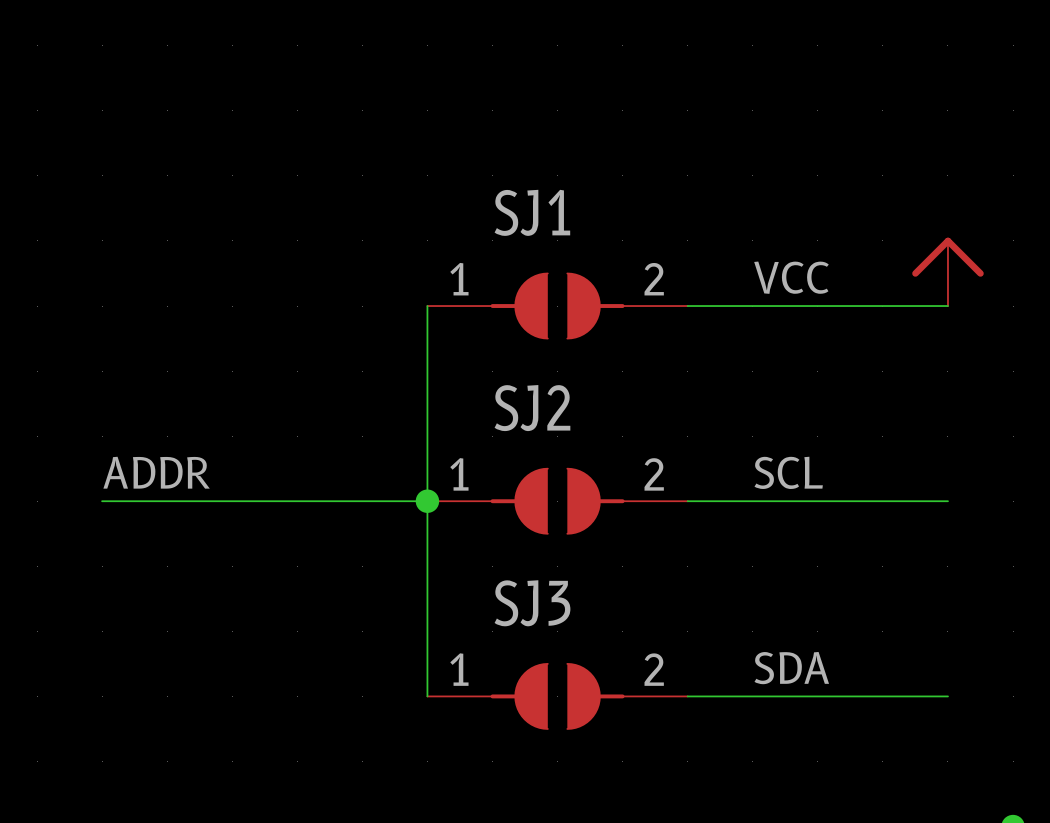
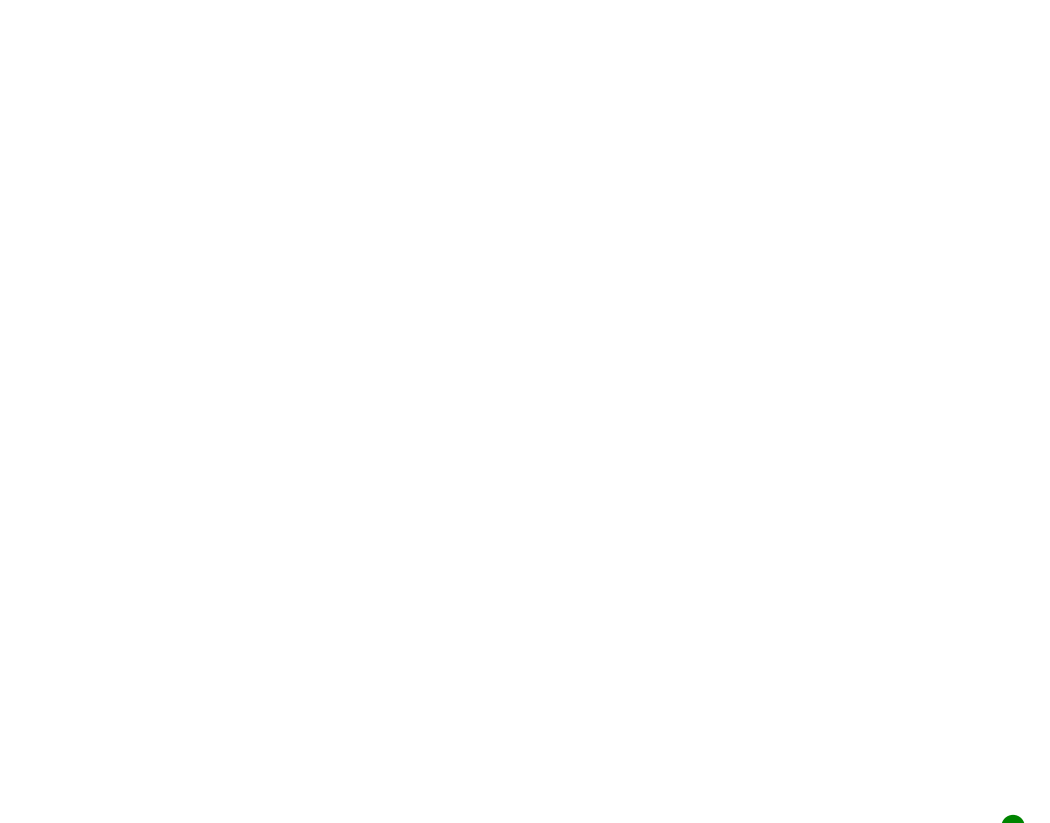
power symbol: (947, 271) -> none
label: VCC (791, 277) -> none
wire: (427, 306) (427, 696) -> none
SJ1: (557, 306) -> none
wire: (687, 306) (947, 306) -> none
label: ADDR (156, 472) -> none
label: SCL (788, 472) -> none
wire: (102, 501) (427, 501) -> none
junction: (427, 501) -> none
SJ2: (557, 501) -> none
wire: (687, 501) (947, 501) -> none
label: SDA (791, 668) -> none
SJ3: (557, 696) -> none
wire: (687, 696) (947, 696) -> none

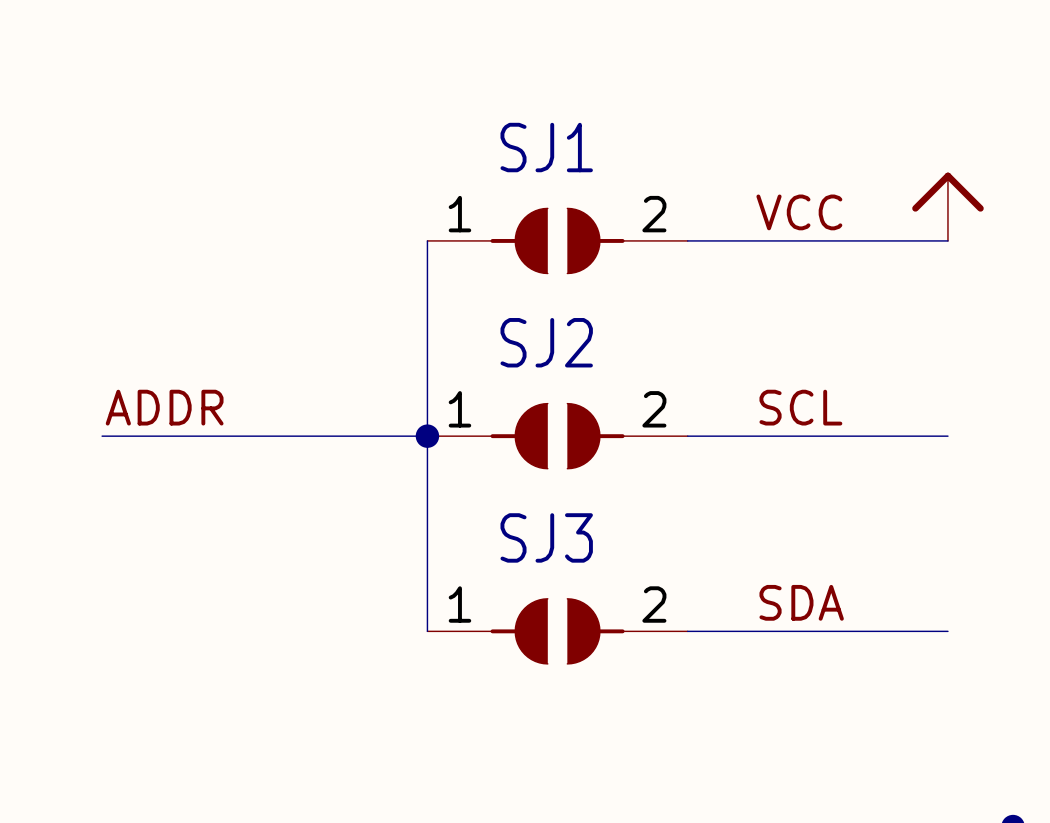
power symbol: none -> (947, 206)
label: none -> VCC (799, 212)
wire: none -> (427, 240) (427, 631)
SJ1: none -> (557, 240)
wire: none -> (687, 240) (947, 240)
label: none -> ADDR (164, 407)
label: none -> SCL (800, 407)
wire: none -> (102, 436) (427, 436)
junction: none -> (427, 436)
SJ2: none -> (557, 436)
wire: none -> (687, 436) (947, 436)
label: none -> SDA (801, 602)
SJ3: none -> (557, 631)
wire: none -> (687, 631) (947, 631)

